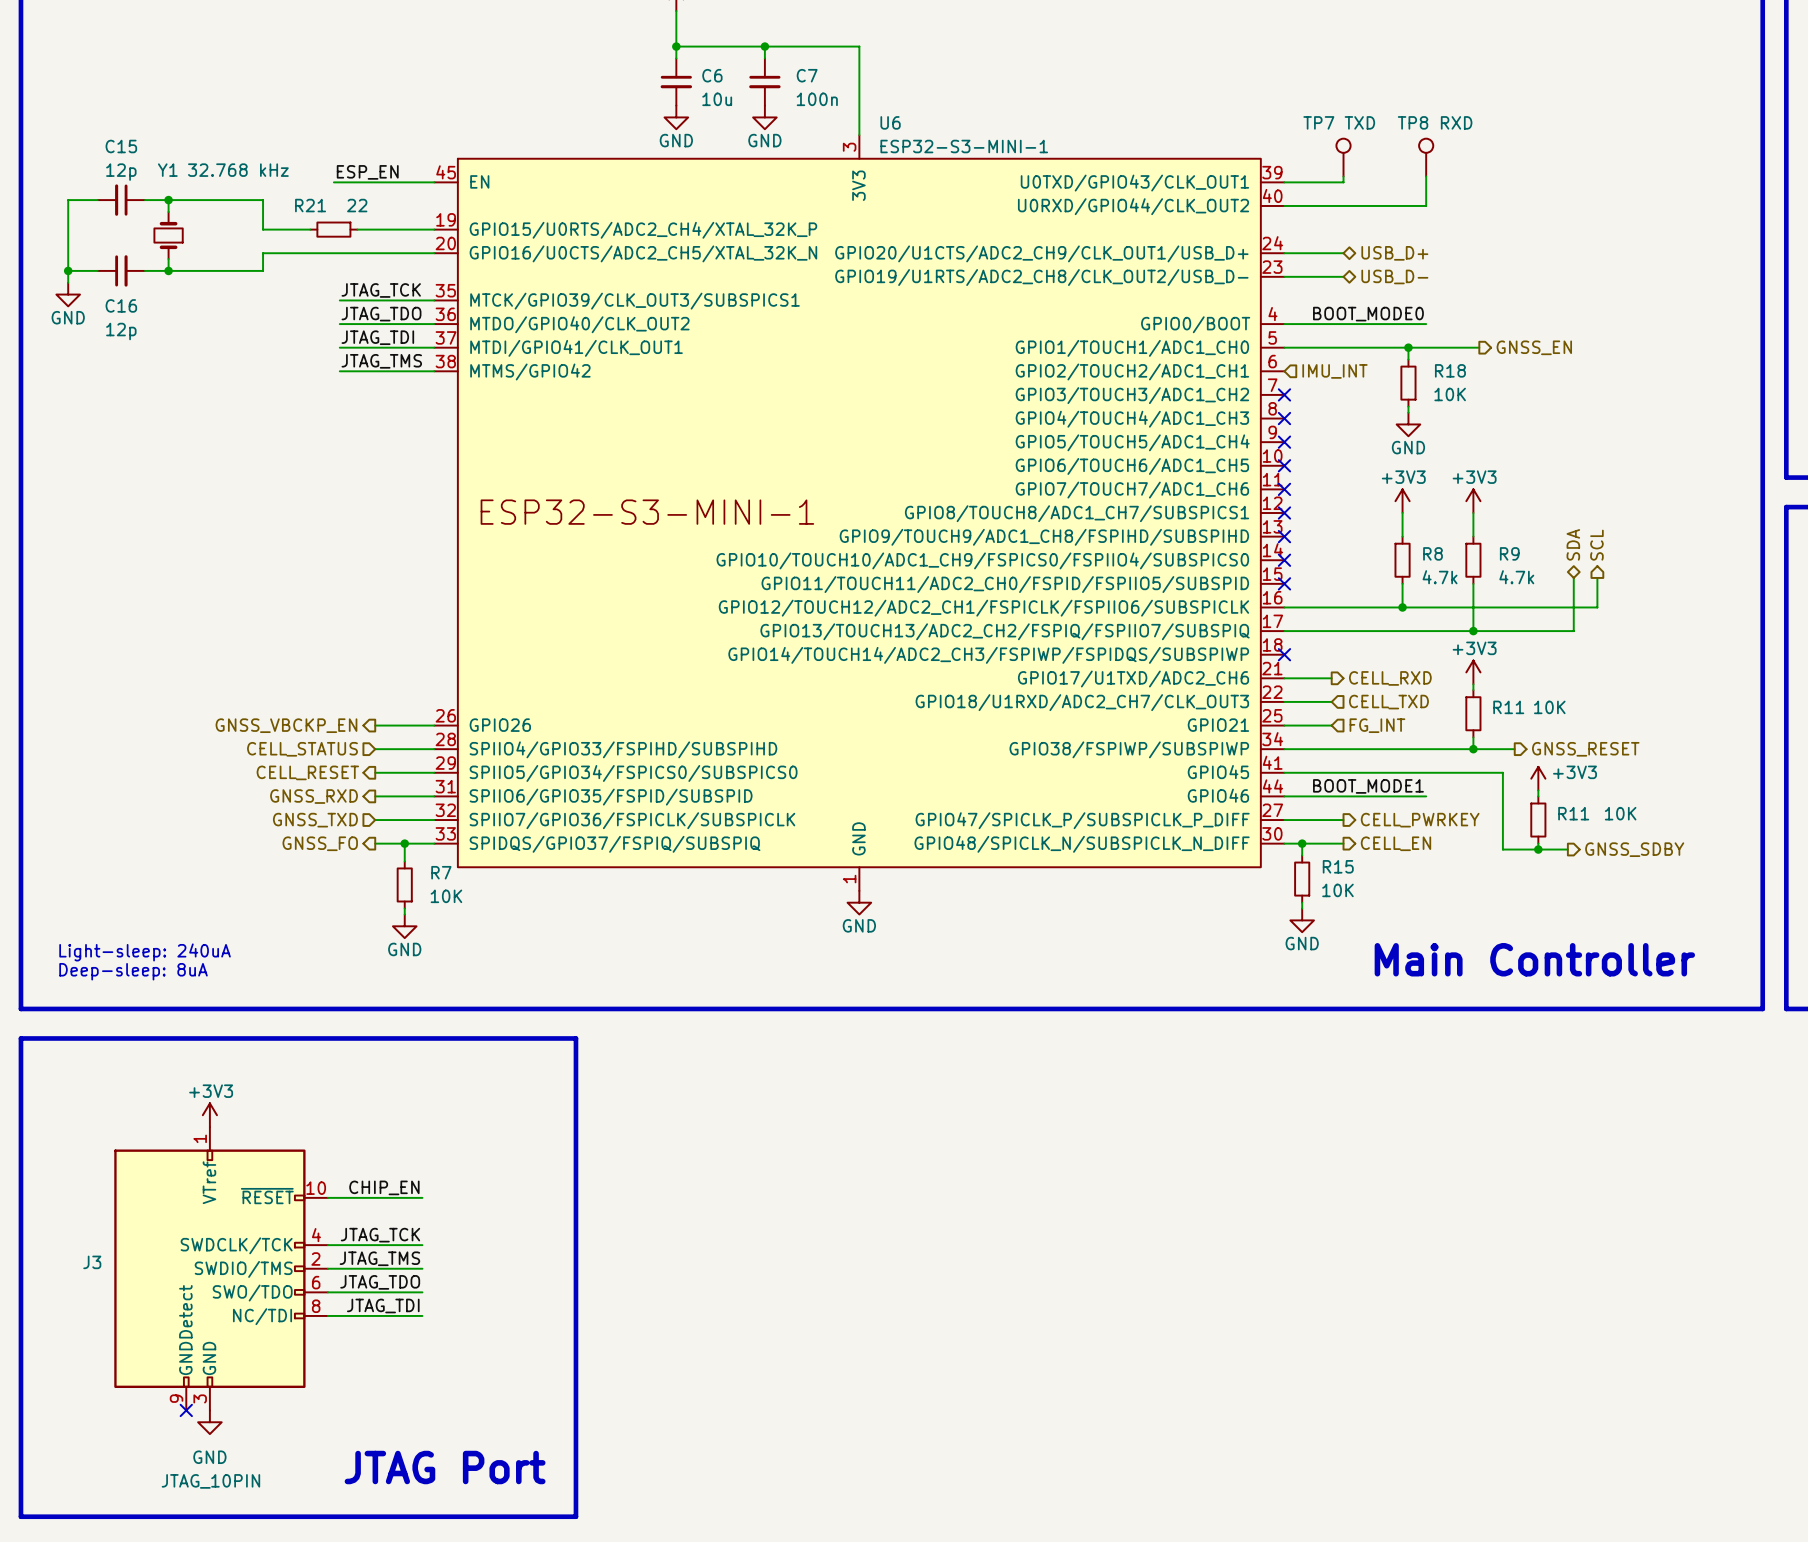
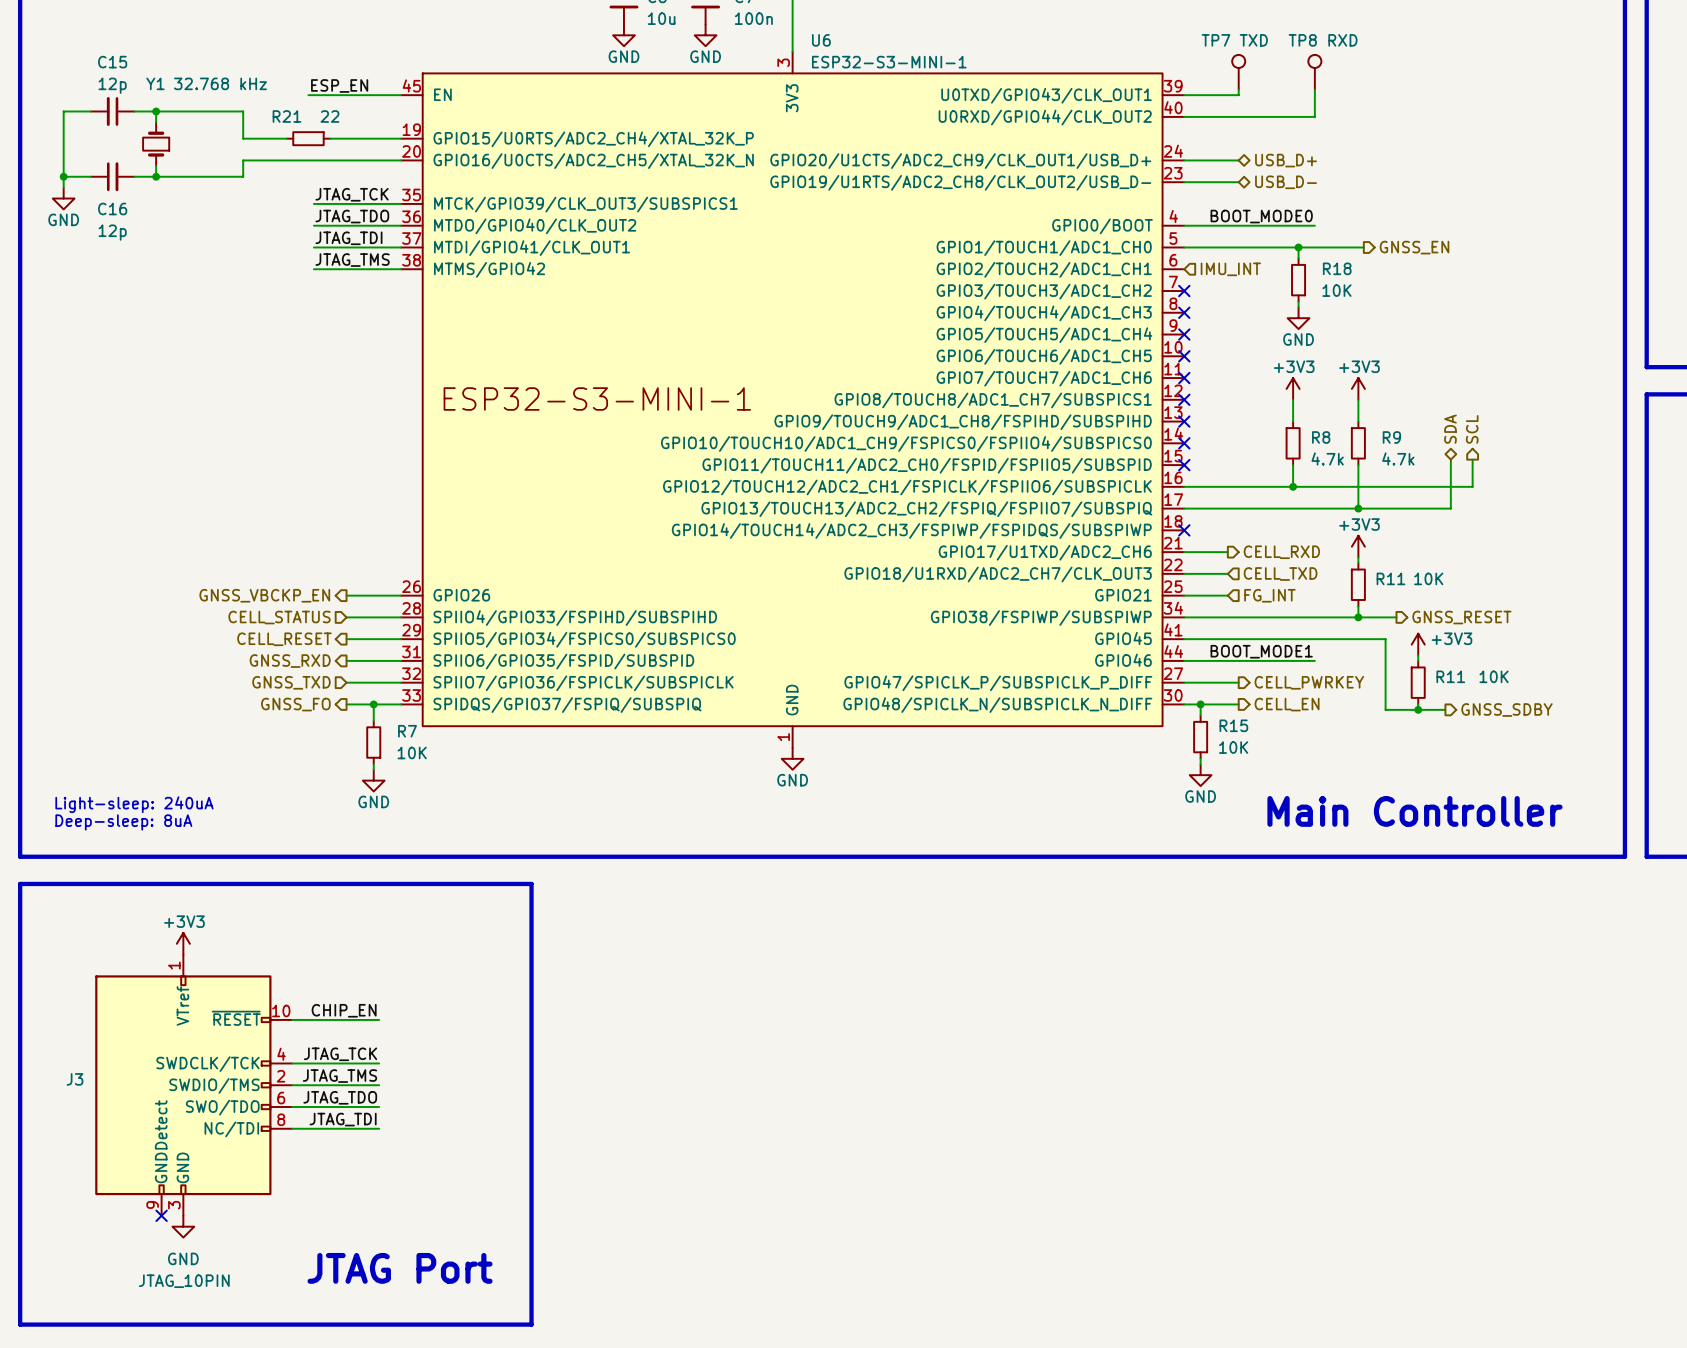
power symbol position: +3V3 (209, 1115) -> +3V3 (183, 943)
label position: CHIP_EN (384, 1187) -> CHIP_EN (344, 1010)
wire: (327, 1197) (422, 1197) -> (292, 1019) (379, 1019)
label position: JTAG_TCK (380, 1235) -> JTAG_TCK (340, 1054)
wire: (327, 1245) (422, 1245) -> (292, 1063) (379, 1063)
label position: JTAG_TMS (379, 1258) -> JTAG_TMS (339, 1076)
J3 position: (221, 1268) -> (193, 1085)
wire: (327, 1268) (422, 1268) -> (292, 1085) (379, 1085)
label position: JTAG_TDO (380, 1282) -> JTAG_TDO (340, 1097)
wire: (327, 1292) (422, 1292) -> (292, 1107) (379, 1107)
label position: JTAG_TDI (383, 1306) -> JTAG_TDI (343, 1119)
wire: (327, 1315) (422, 1315) -> (292, 1128) (379, 1128)
no-connect mark position: (186, 1410) -> (161, 1215)
power symbol position: GND (209, 1422) -> GND (183, 1226)
text position: JTAG Port (445, 1467) -> JTAG Port (400, 1268)

